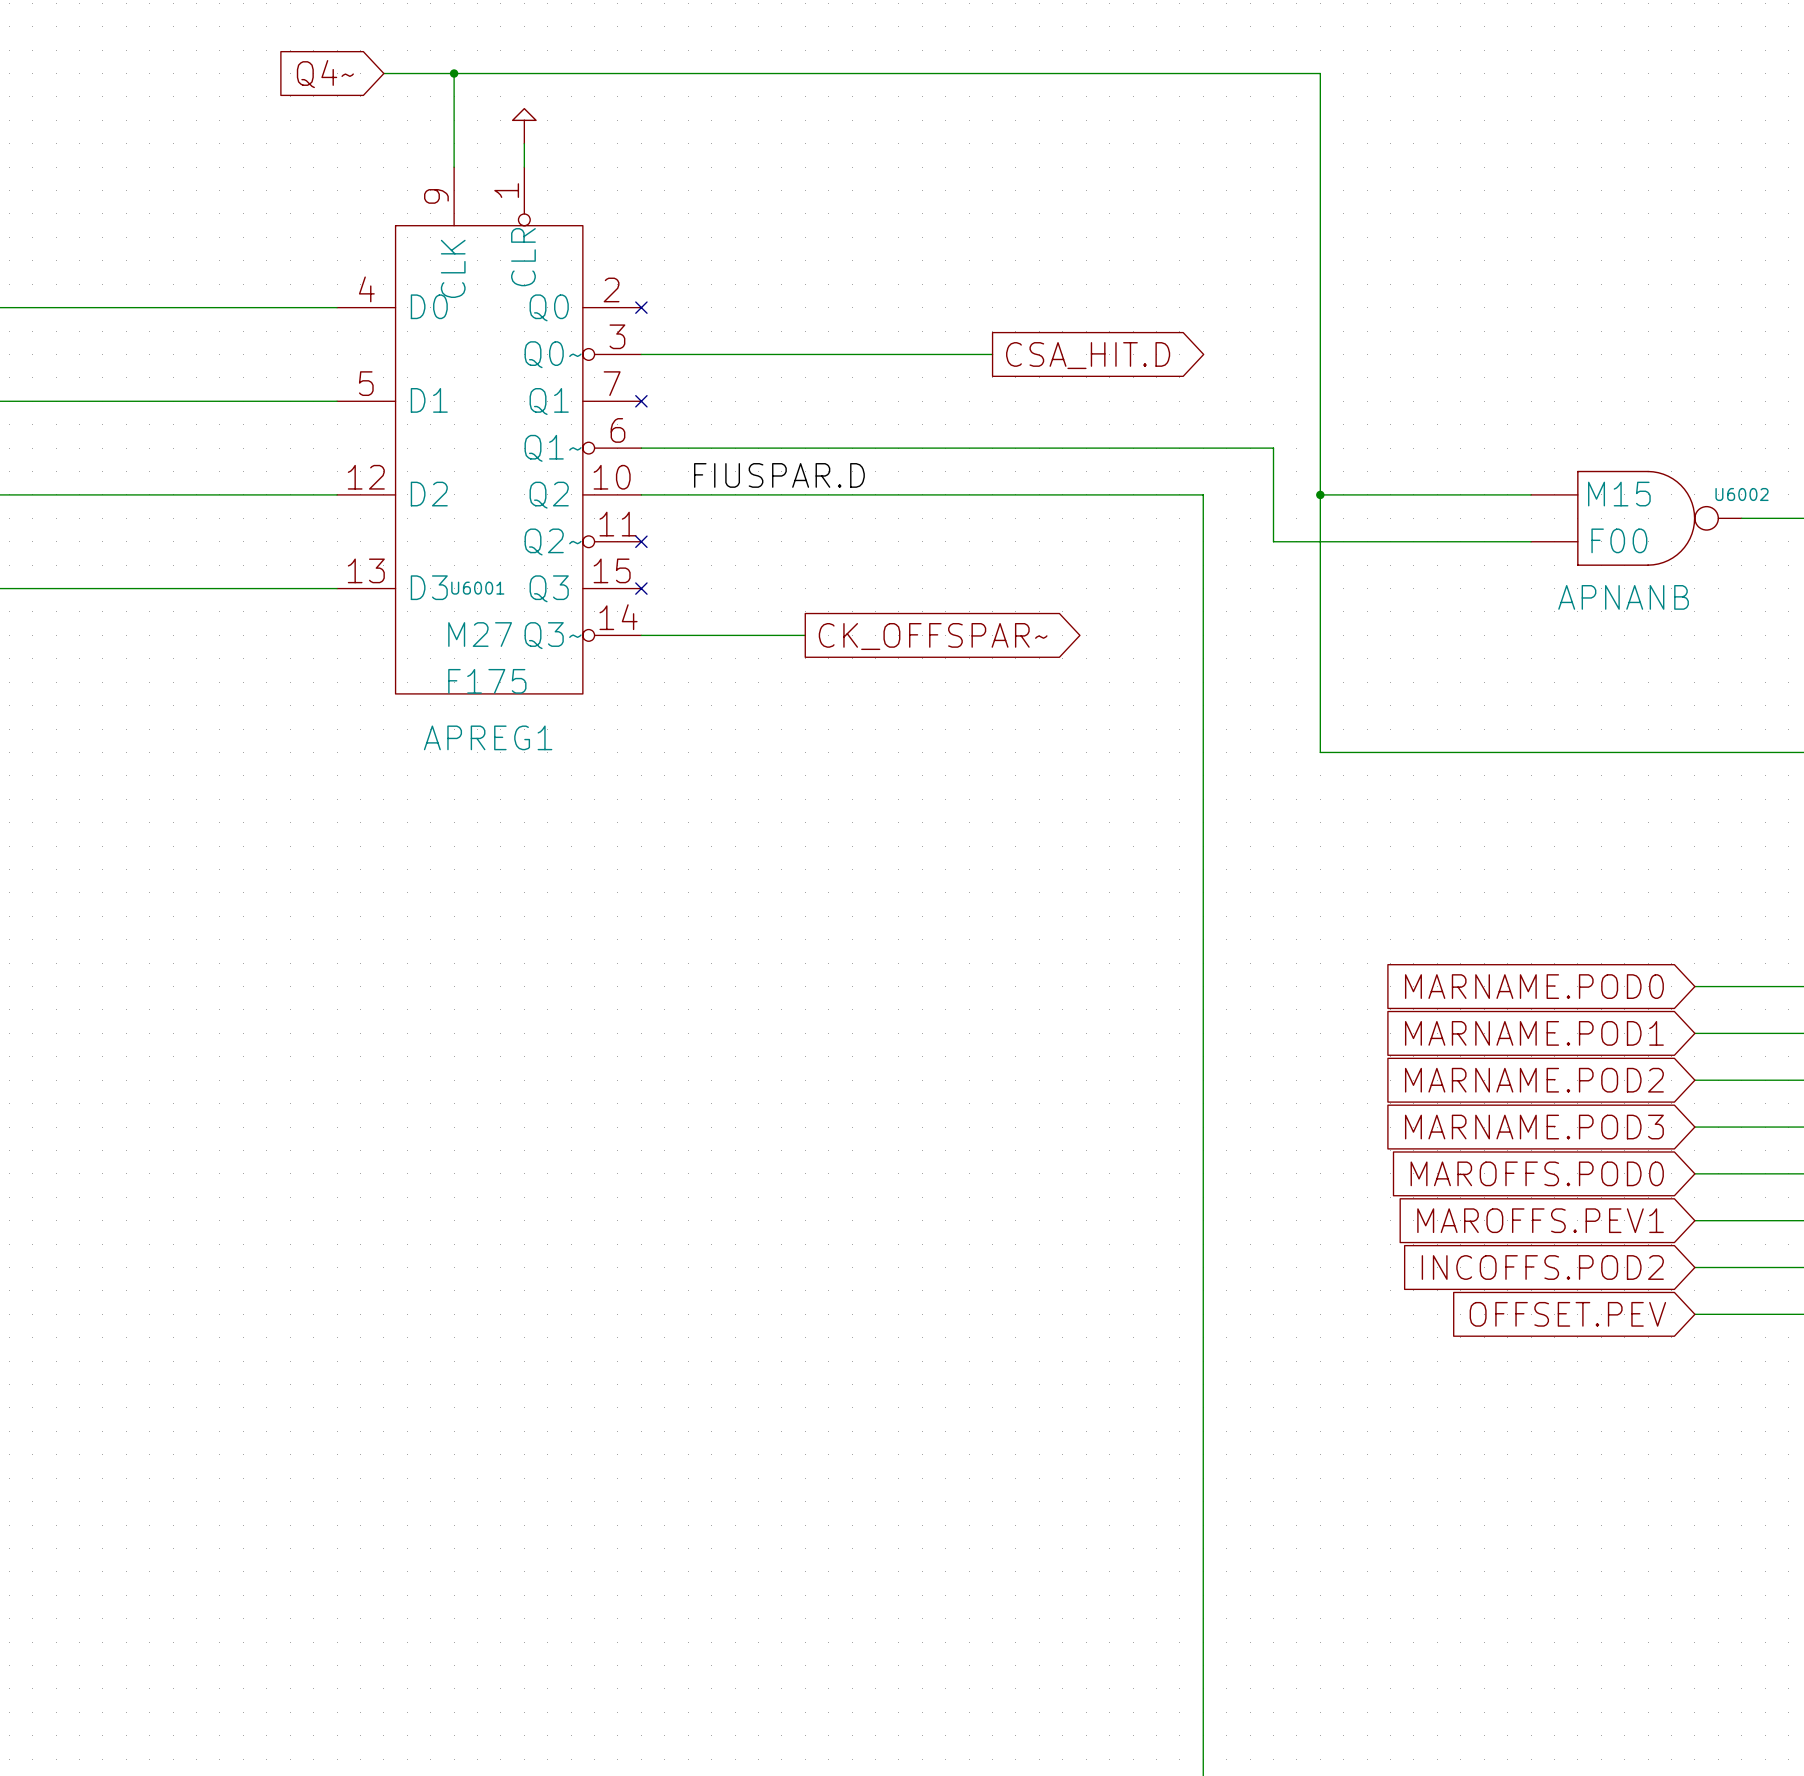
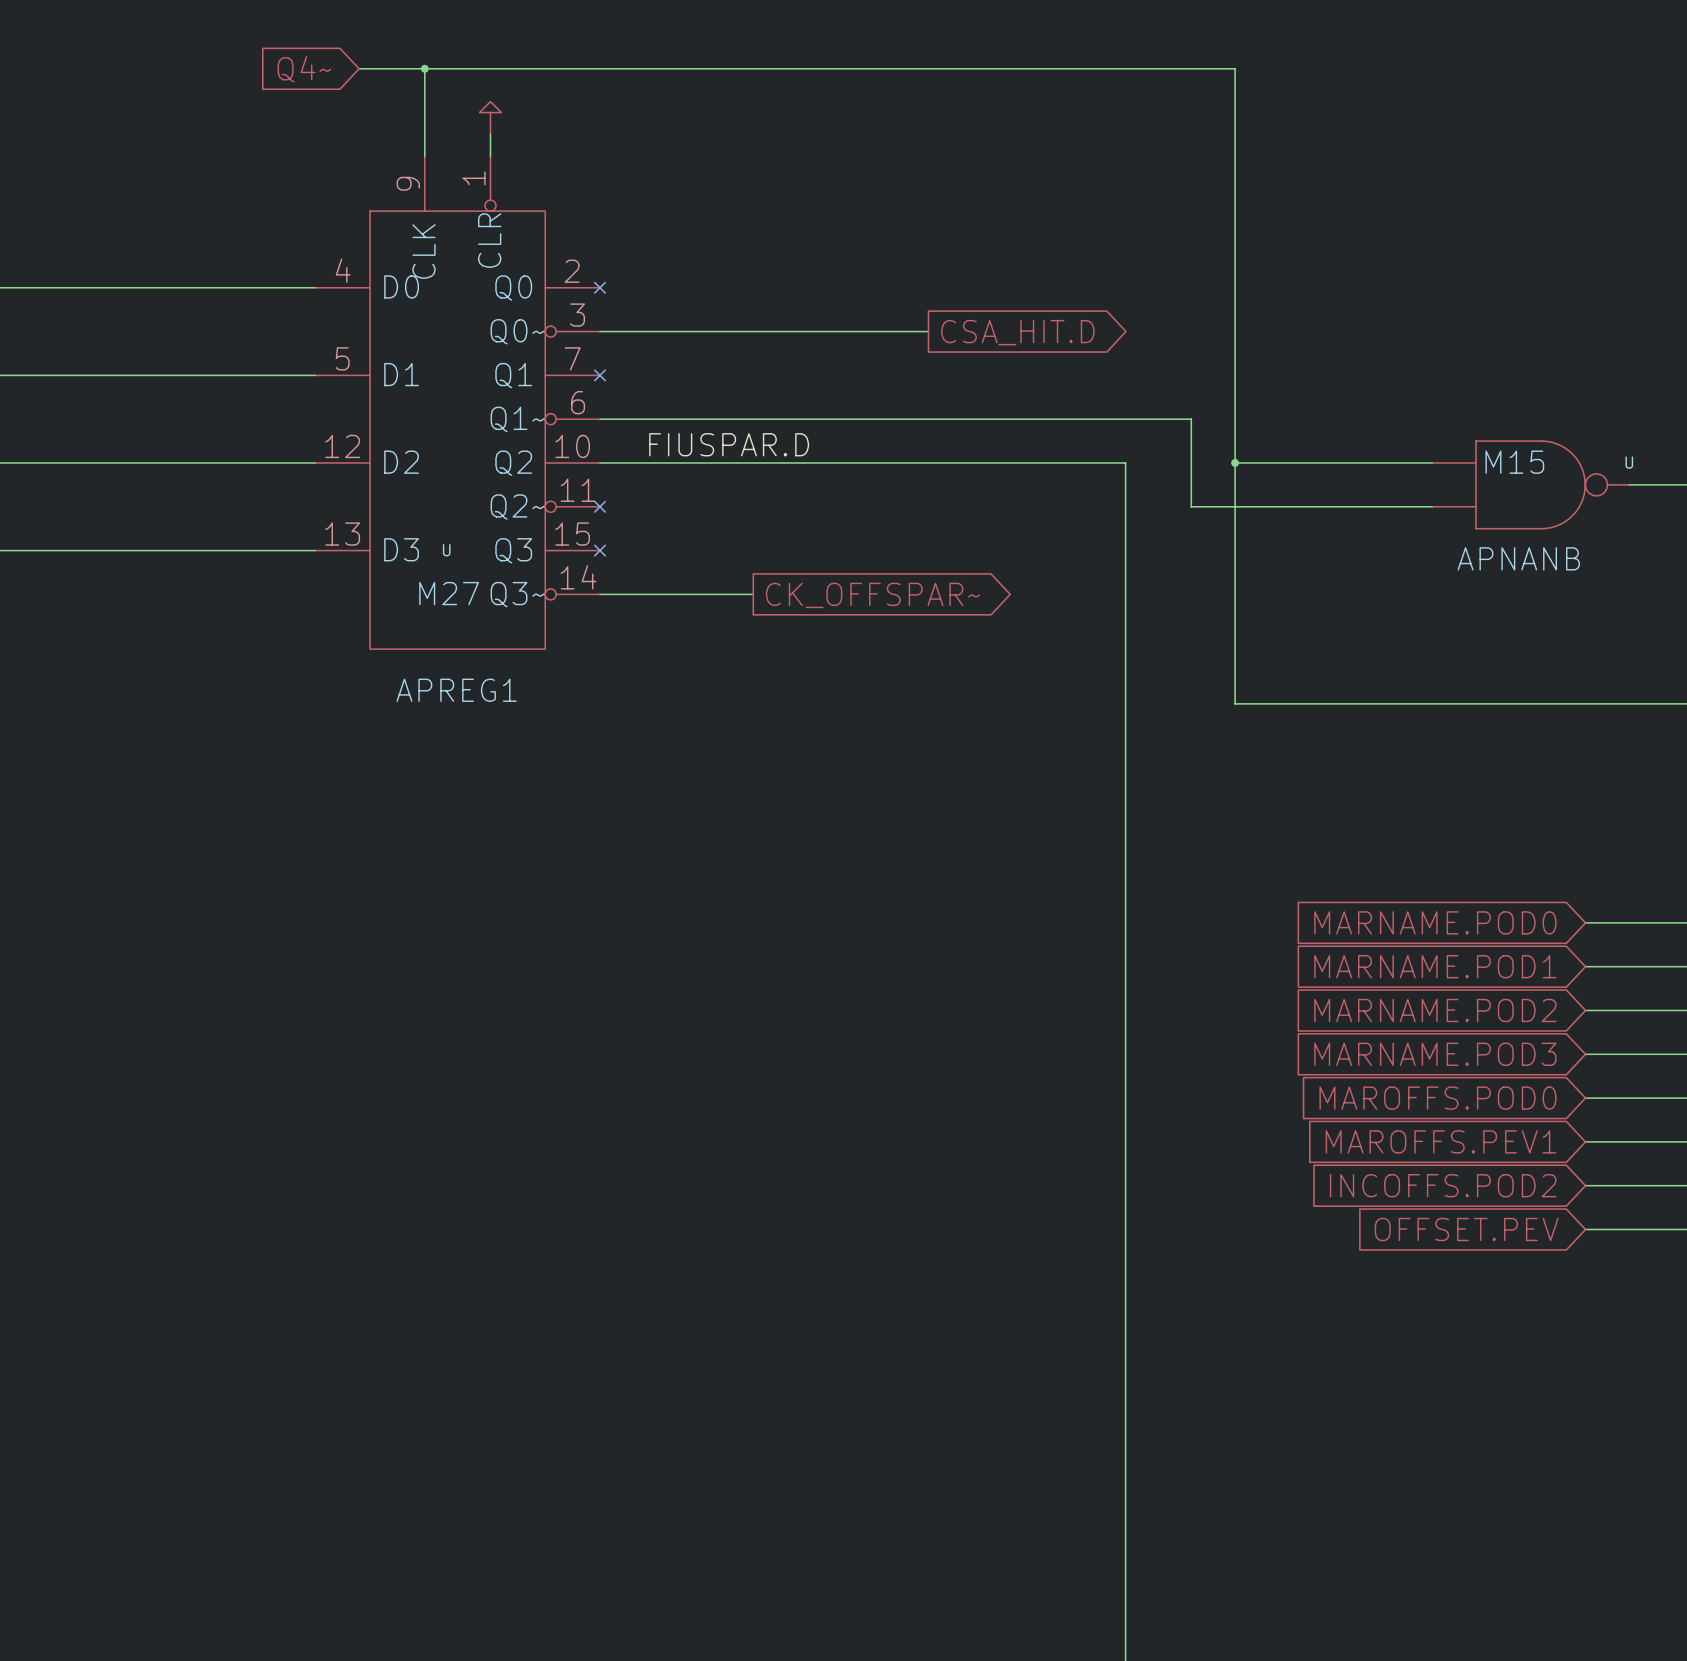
U6002 name: U6002 (1742, 494) -> U (1629, 462)
U6002 value: F00 (1619, 540) -> none
U6001 name: U6001 (477, 588) -> U (446, 550)
U6001 value: F175 (487, 681) -> none

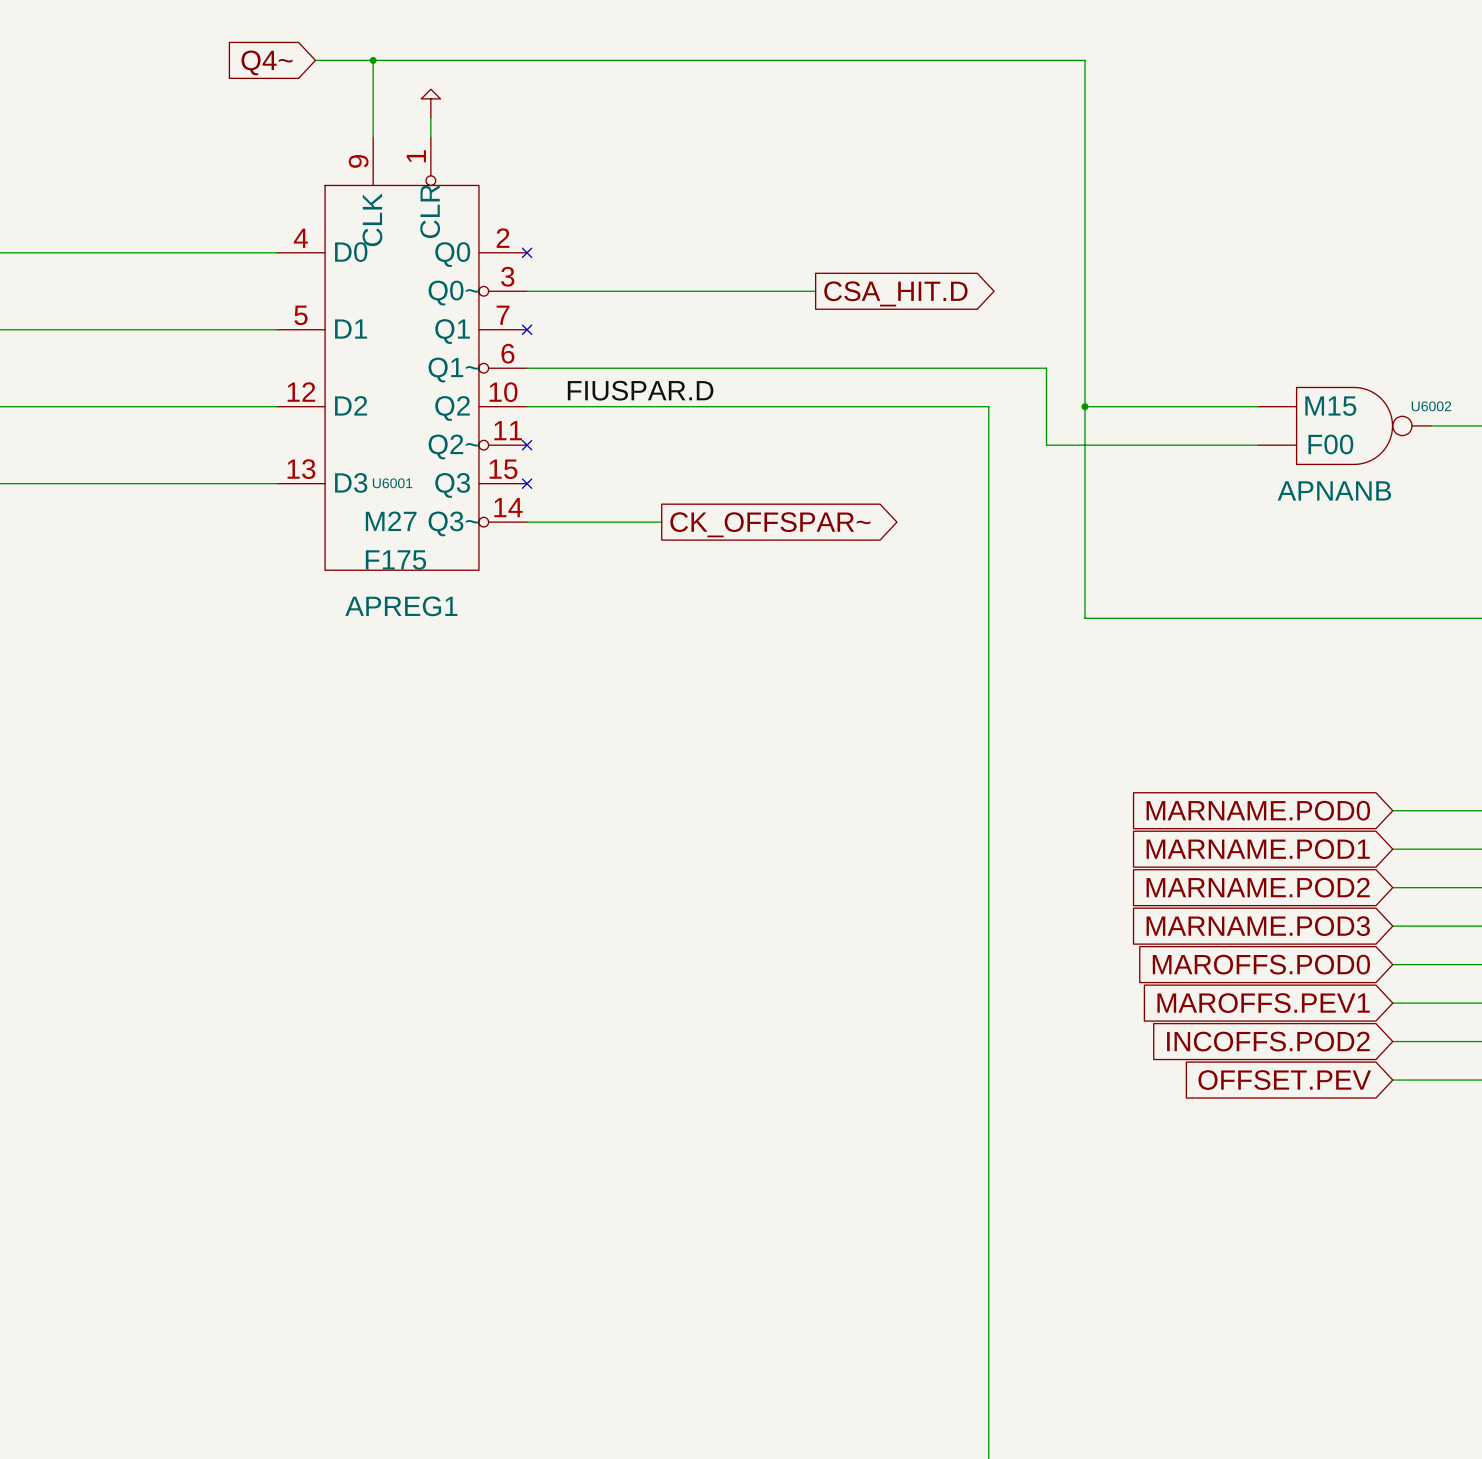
U name: U (1629, 462) -> U6002 (1431, 406)
U value: none -> F00 (1330, 444)
U name: U (446, 550) -> U6001 (392, 483)
U value: none -> F175 (395, 560)

